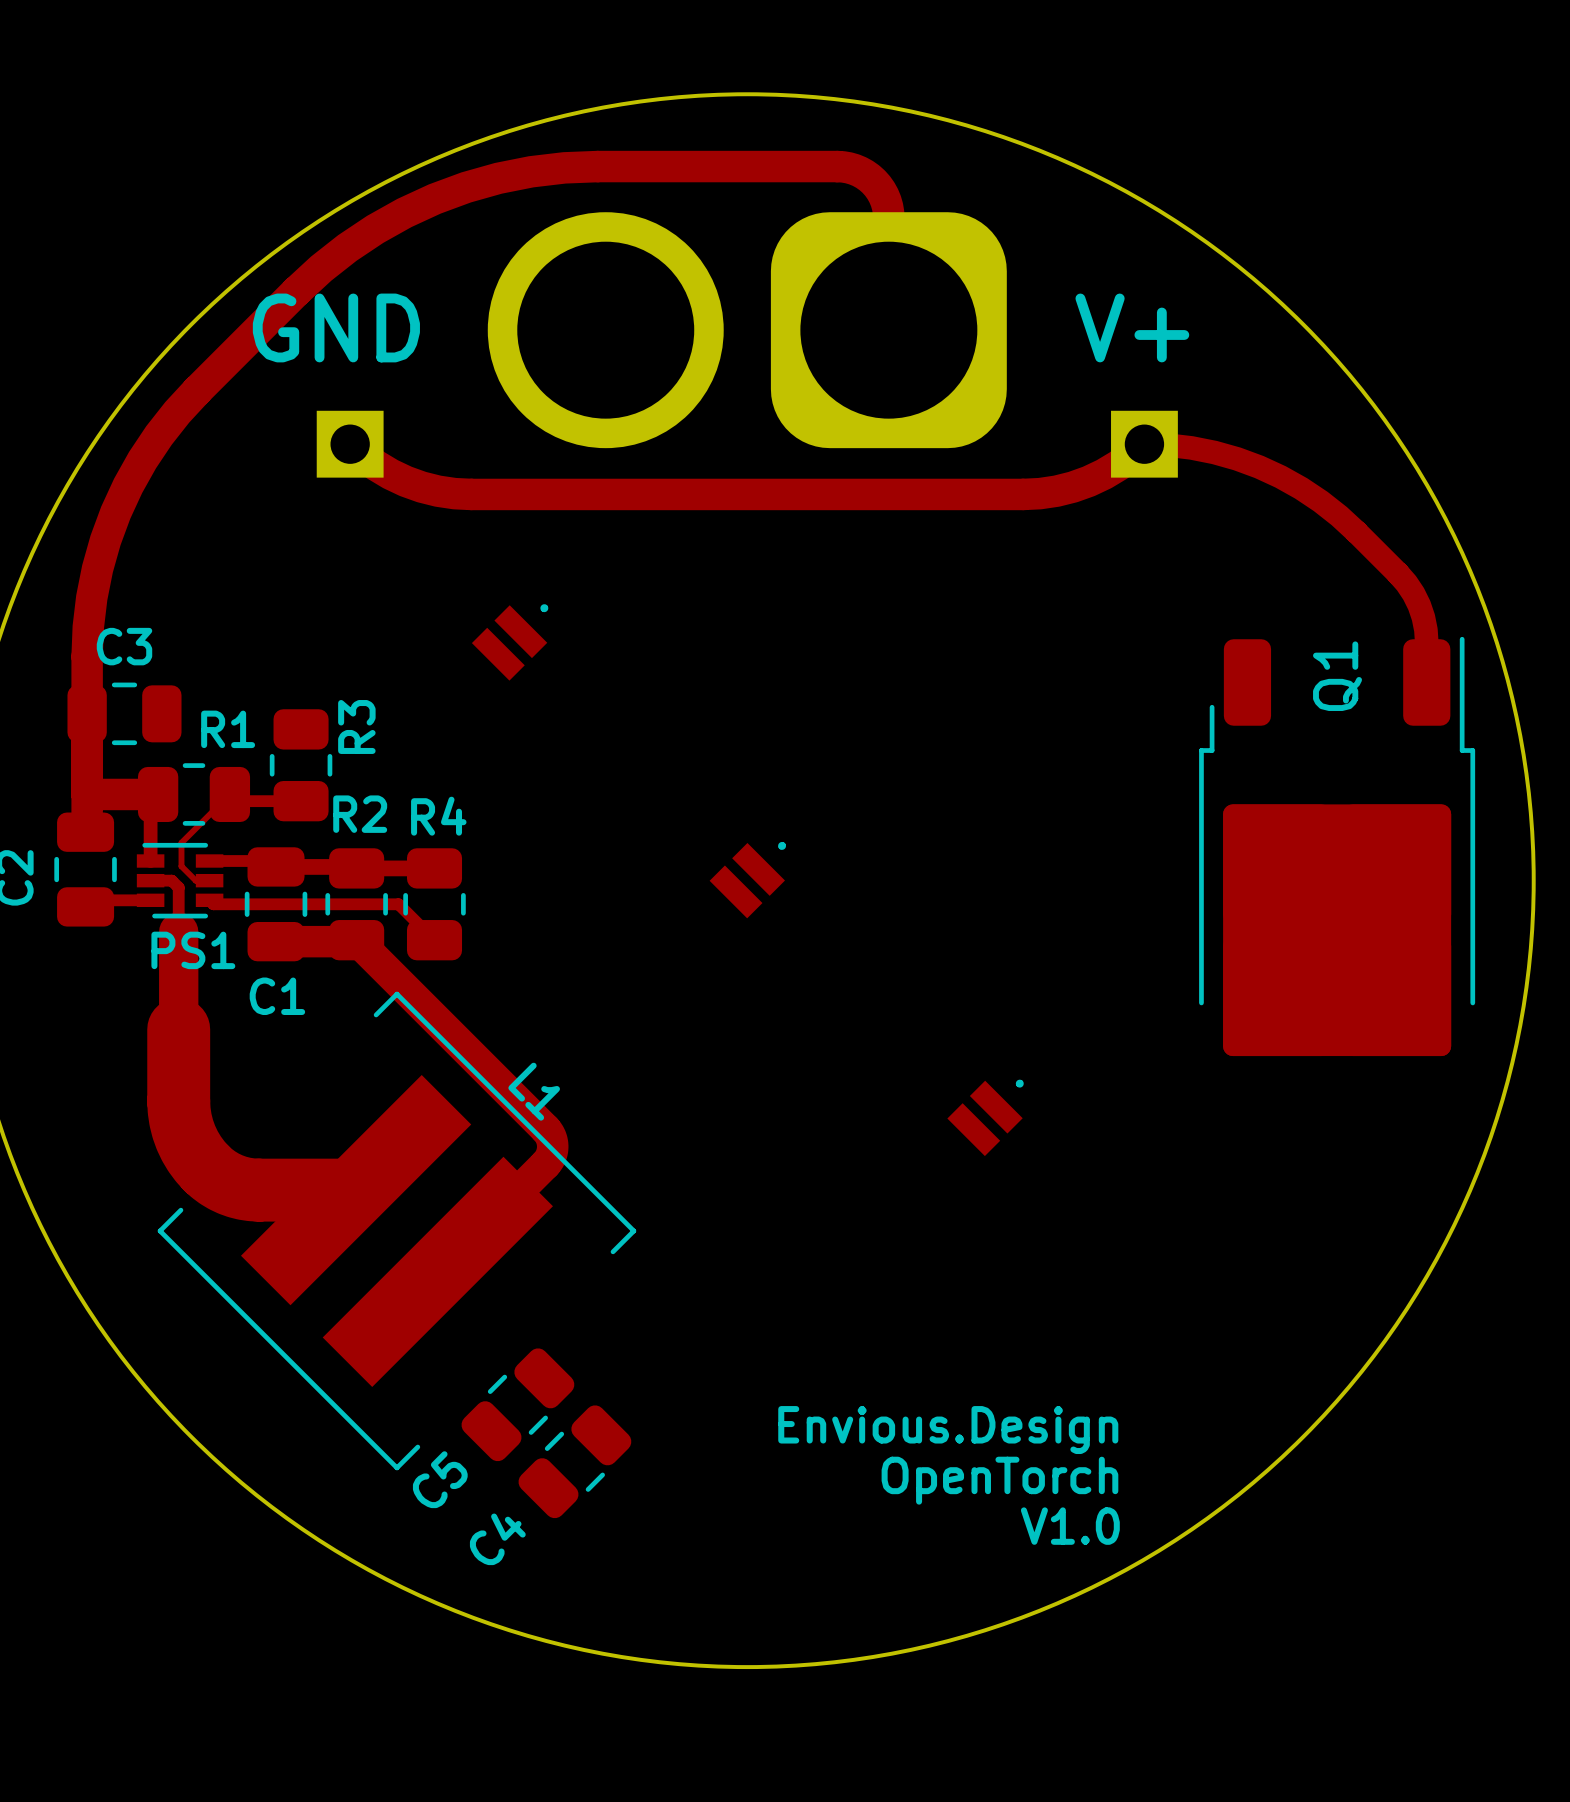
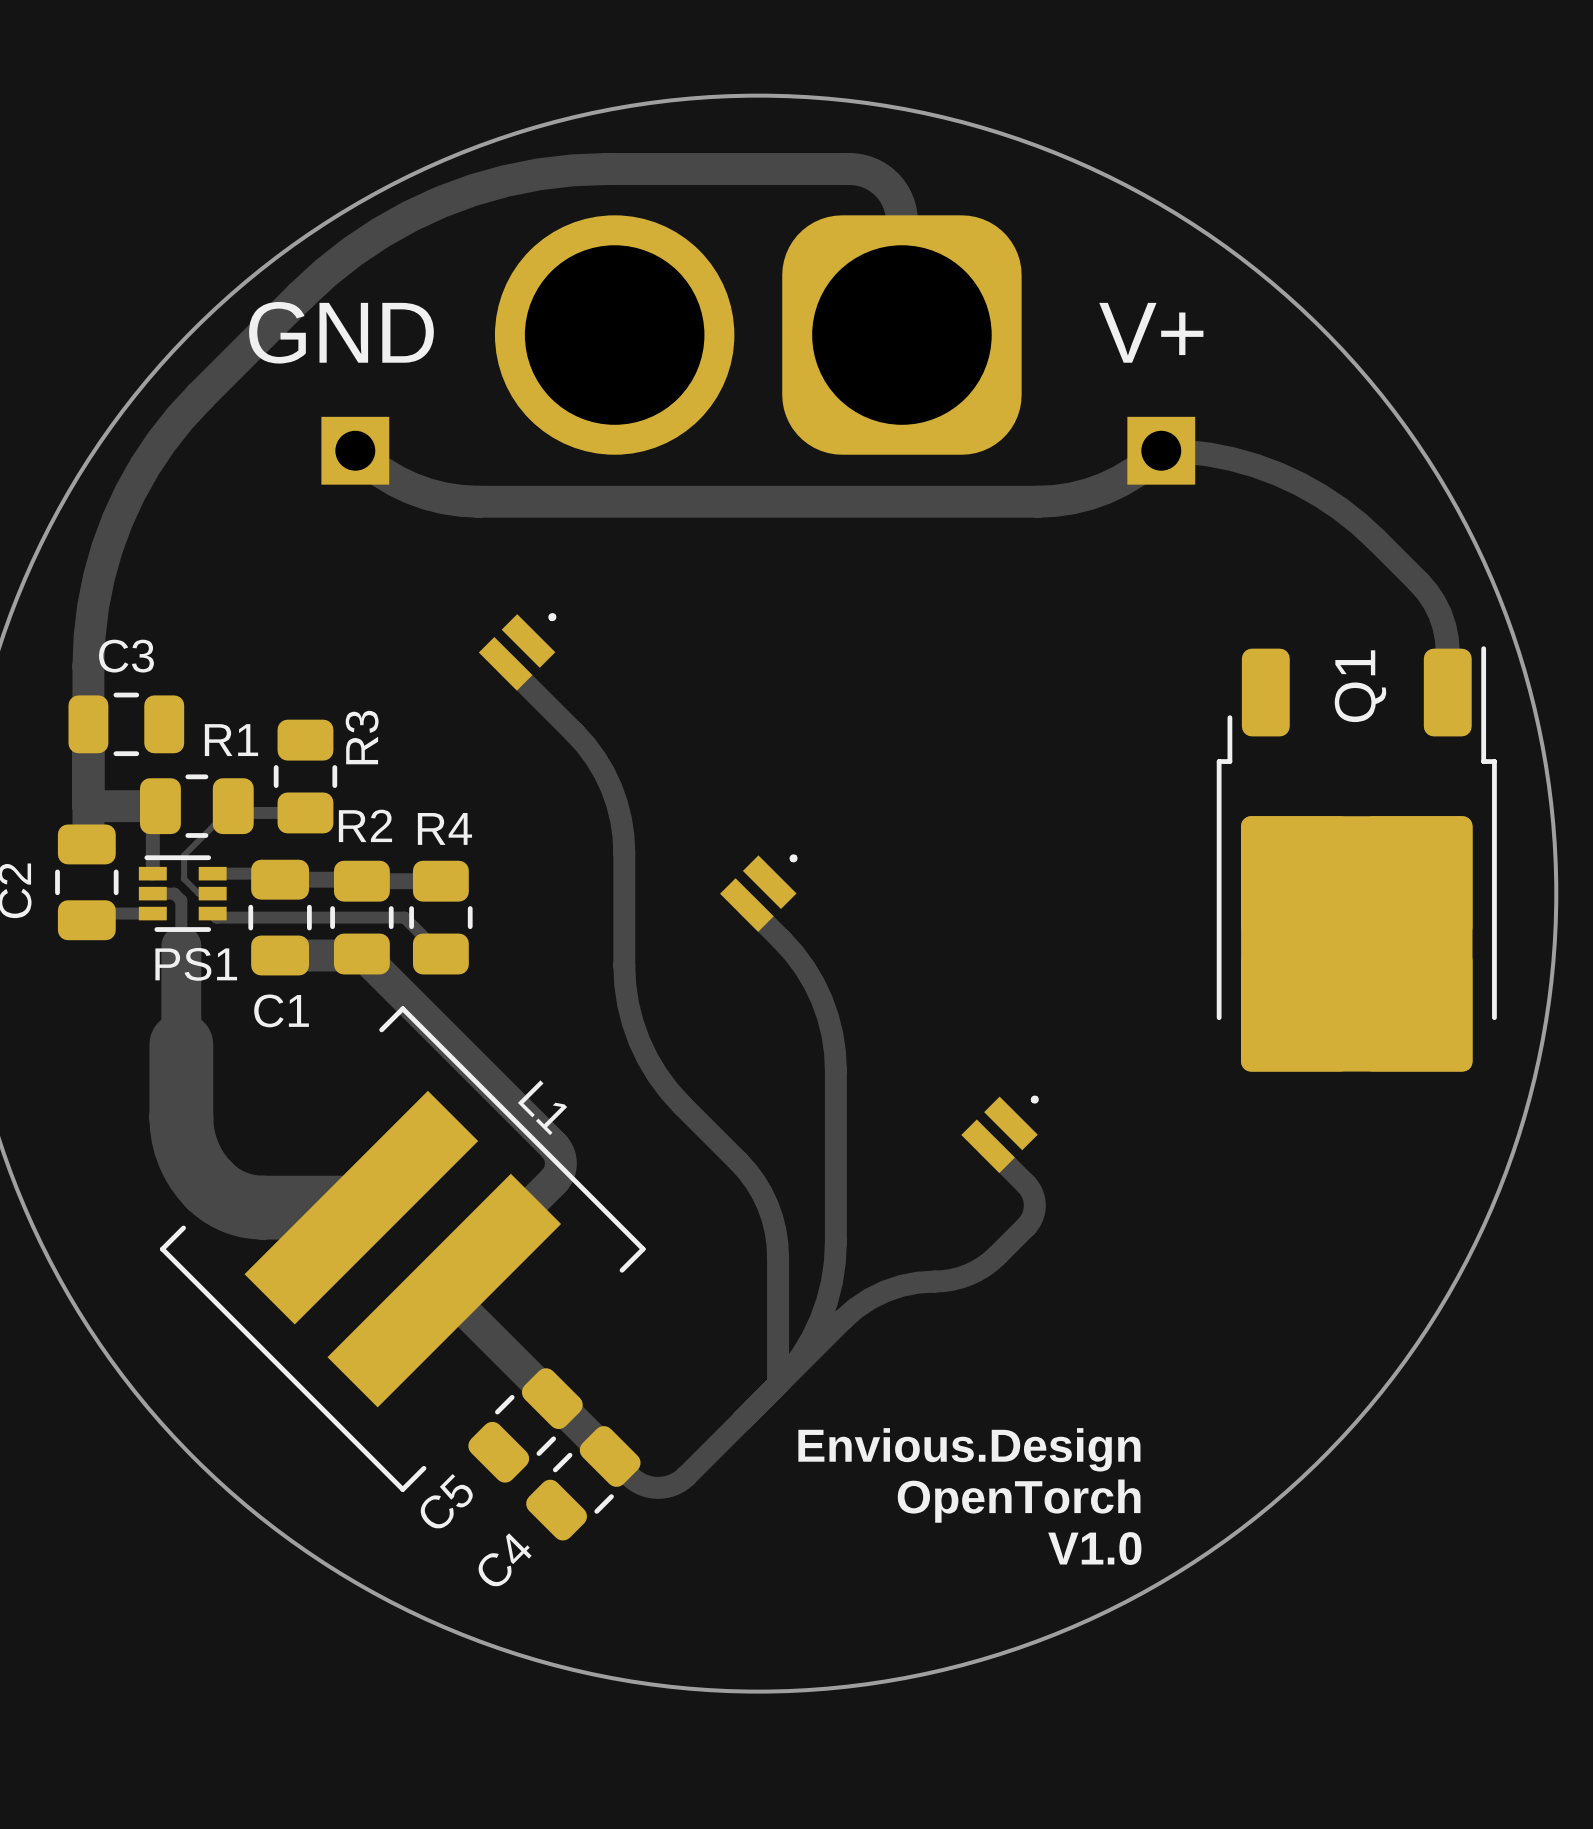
track: none -> (505, 663) (585, 745) (604, 772) (611, 787) (621, 819) (623, 836) (625, 984) (632, 1022) (639, 1041) (657, 1075) (682, 1105) (747, 1171) (767, 1205) (777, 1243) (778, 1384)
track: none -> (746, 905) (794, 953) (814, 983) (827, 1016) (834, 1052) (835, 1242) (831, 1281) (820, 1320) (811, 1338) (789, 1371) (776, 1386)
track: none -> (988, 1146) (1025, 1184) (1032, 1193) (1034, 1209) (1032, 1217) (1025, 1226) (990, 1261) (976, 1271) (951, 1279) (901, 1285) (869, 1298) (855, 1308) (686, 1476) (667, 1486) (649, 1486) (633, 1479) (444, 1290)

